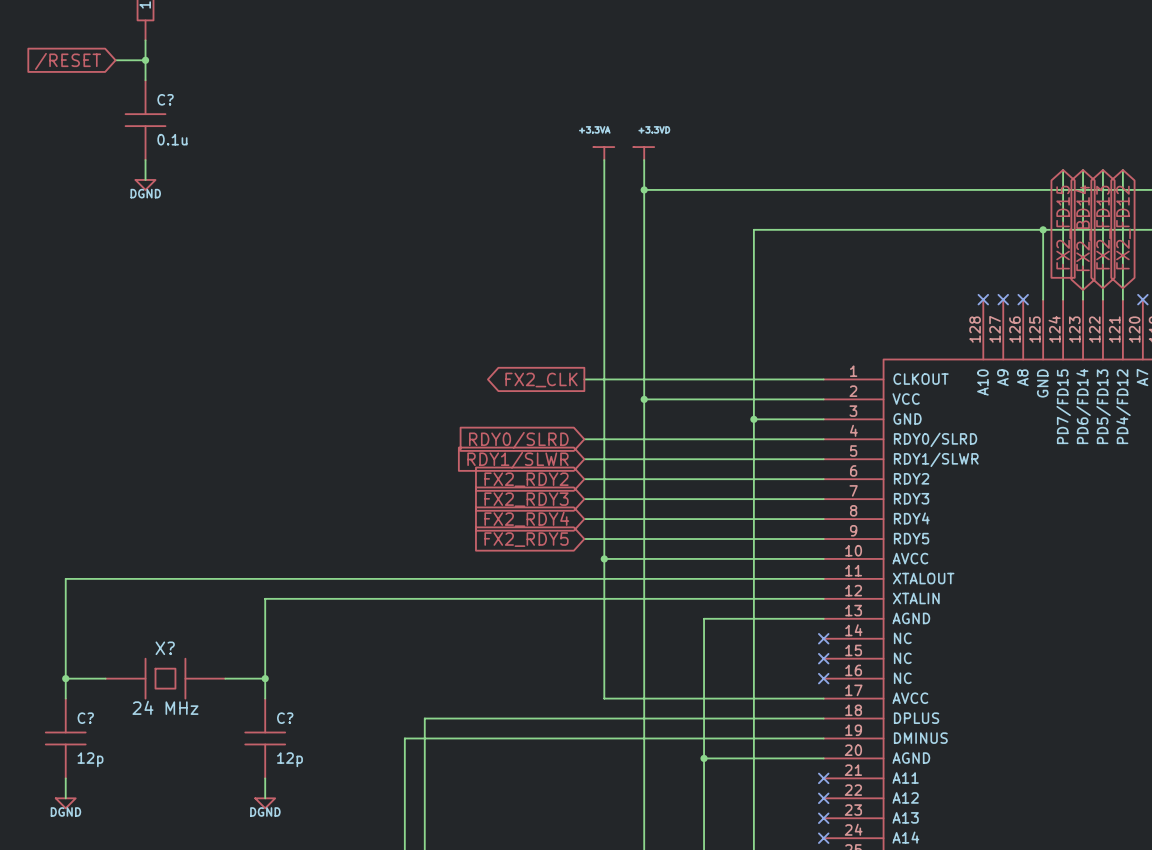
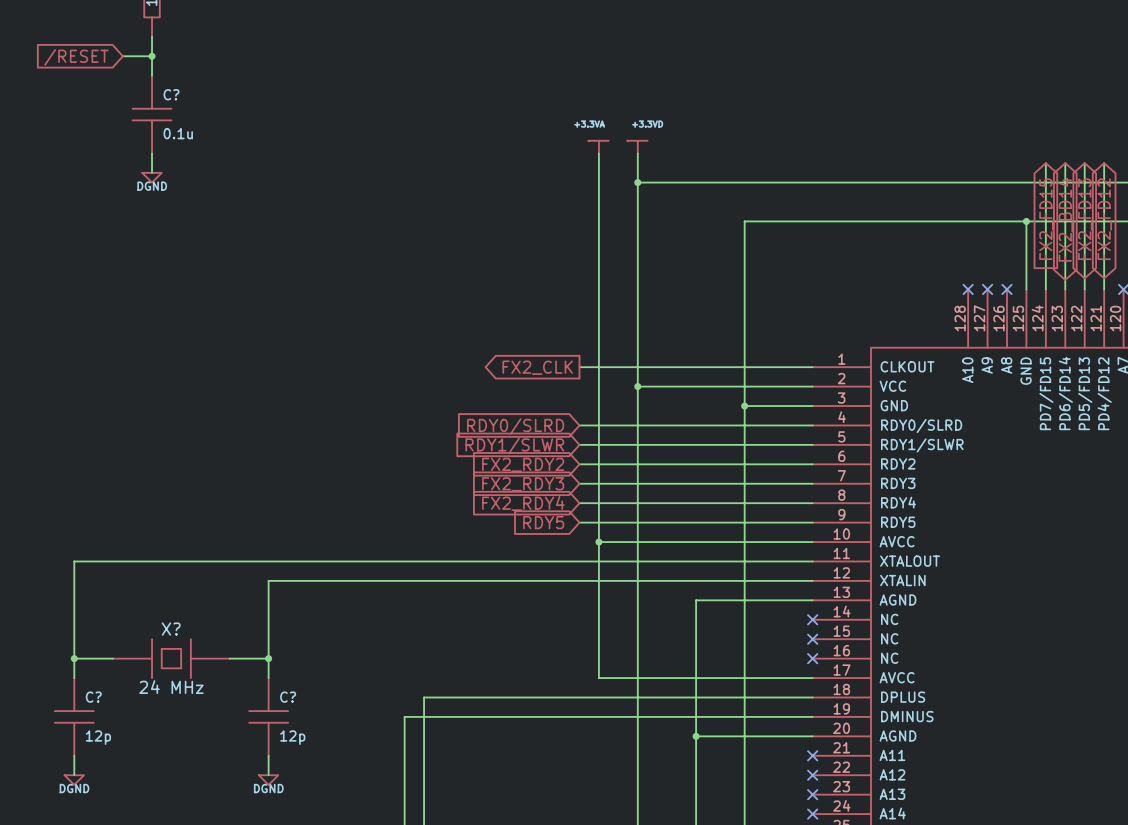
global label: FX2_RDY5 (526, 539) -> RDY5 (543, 522)

